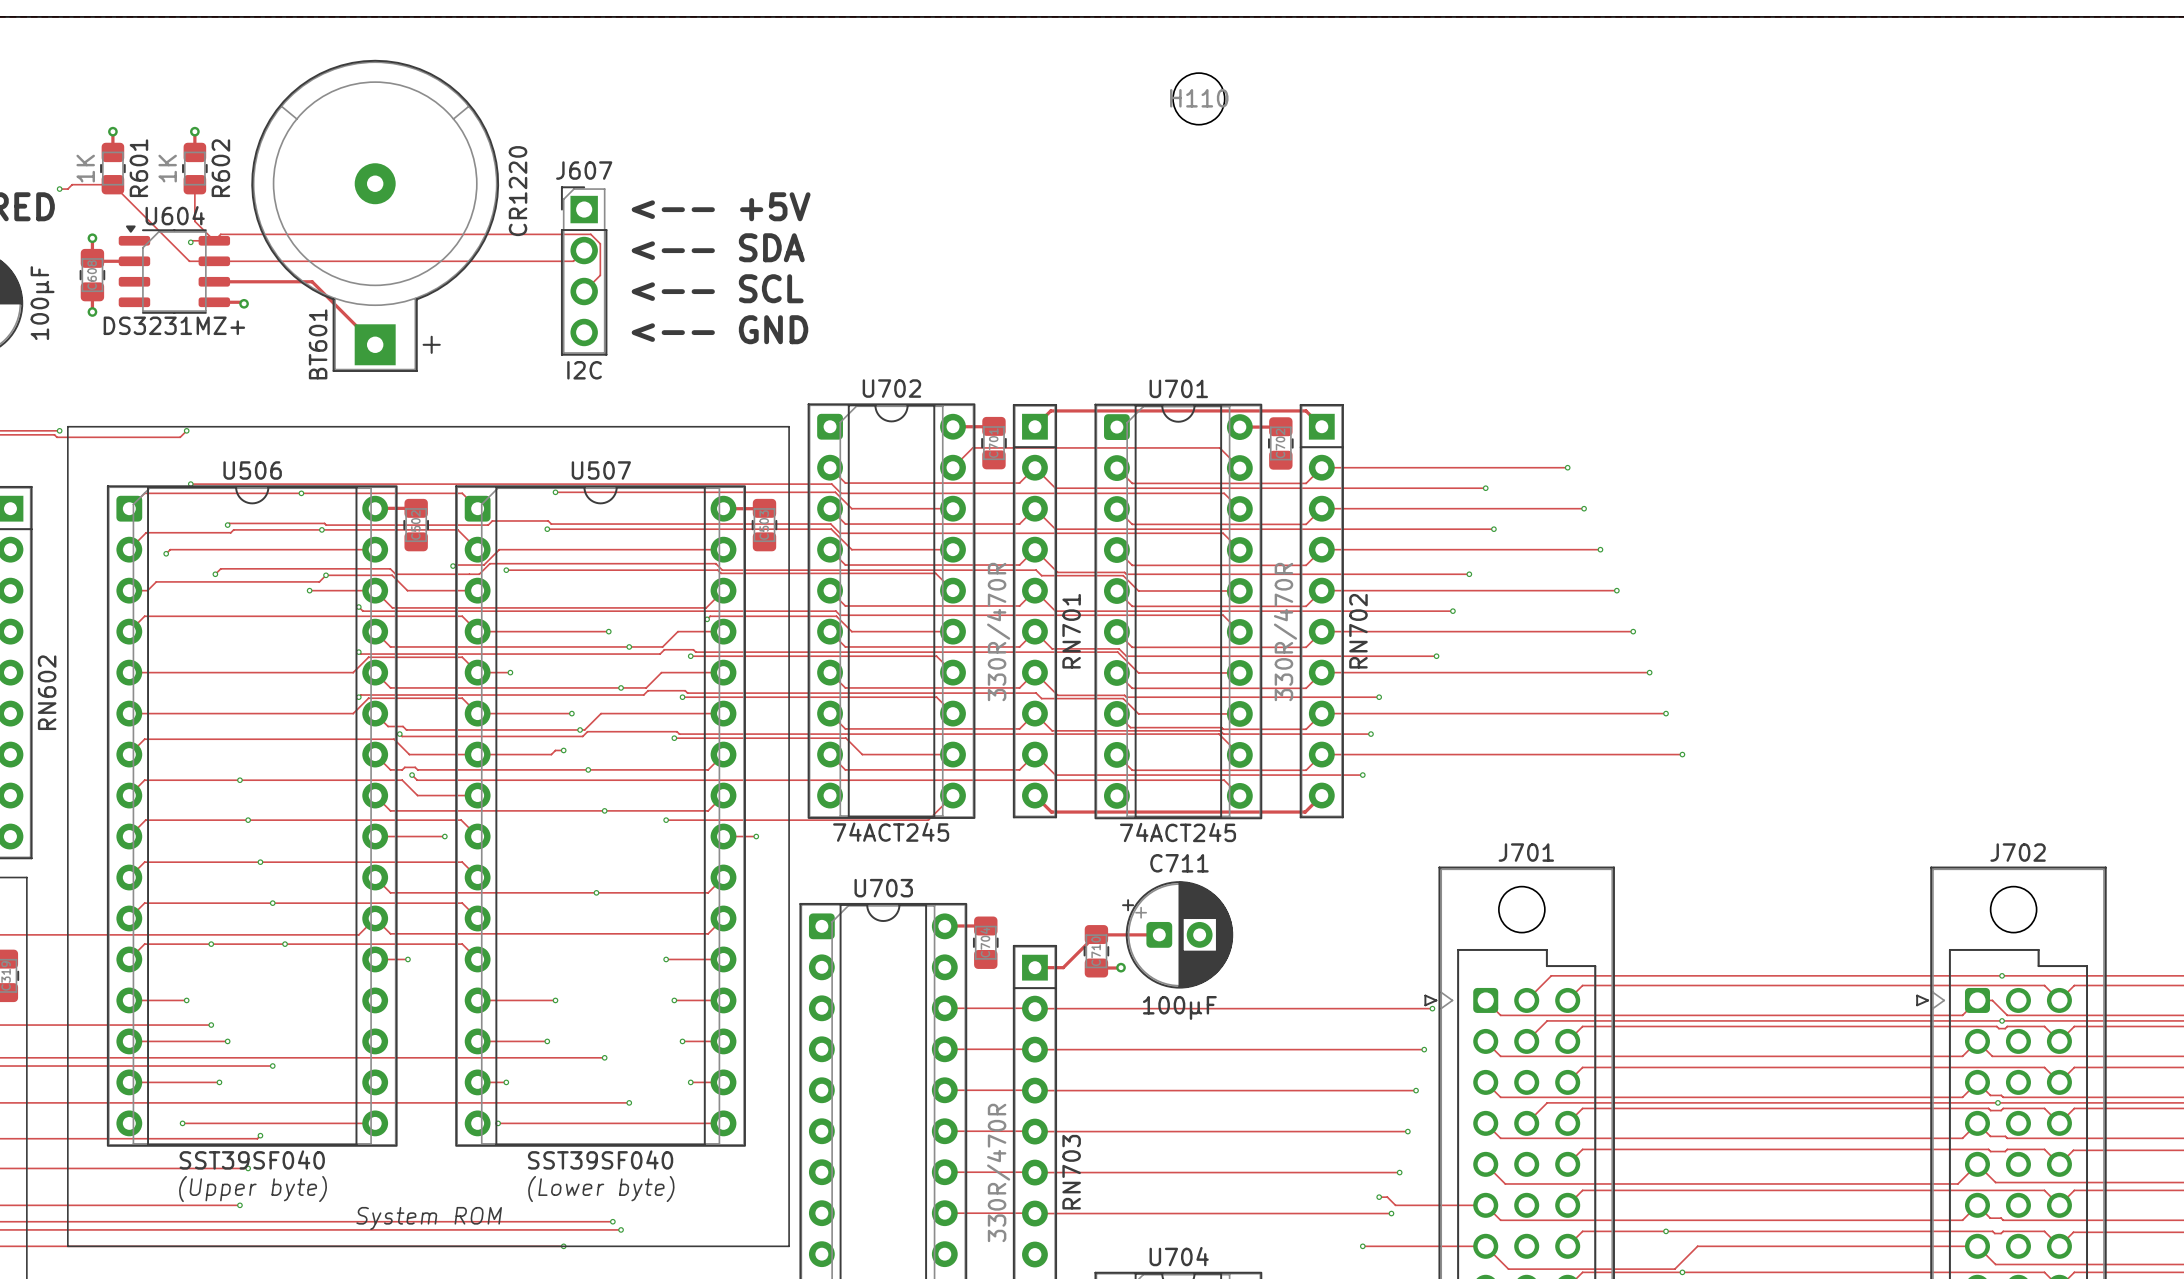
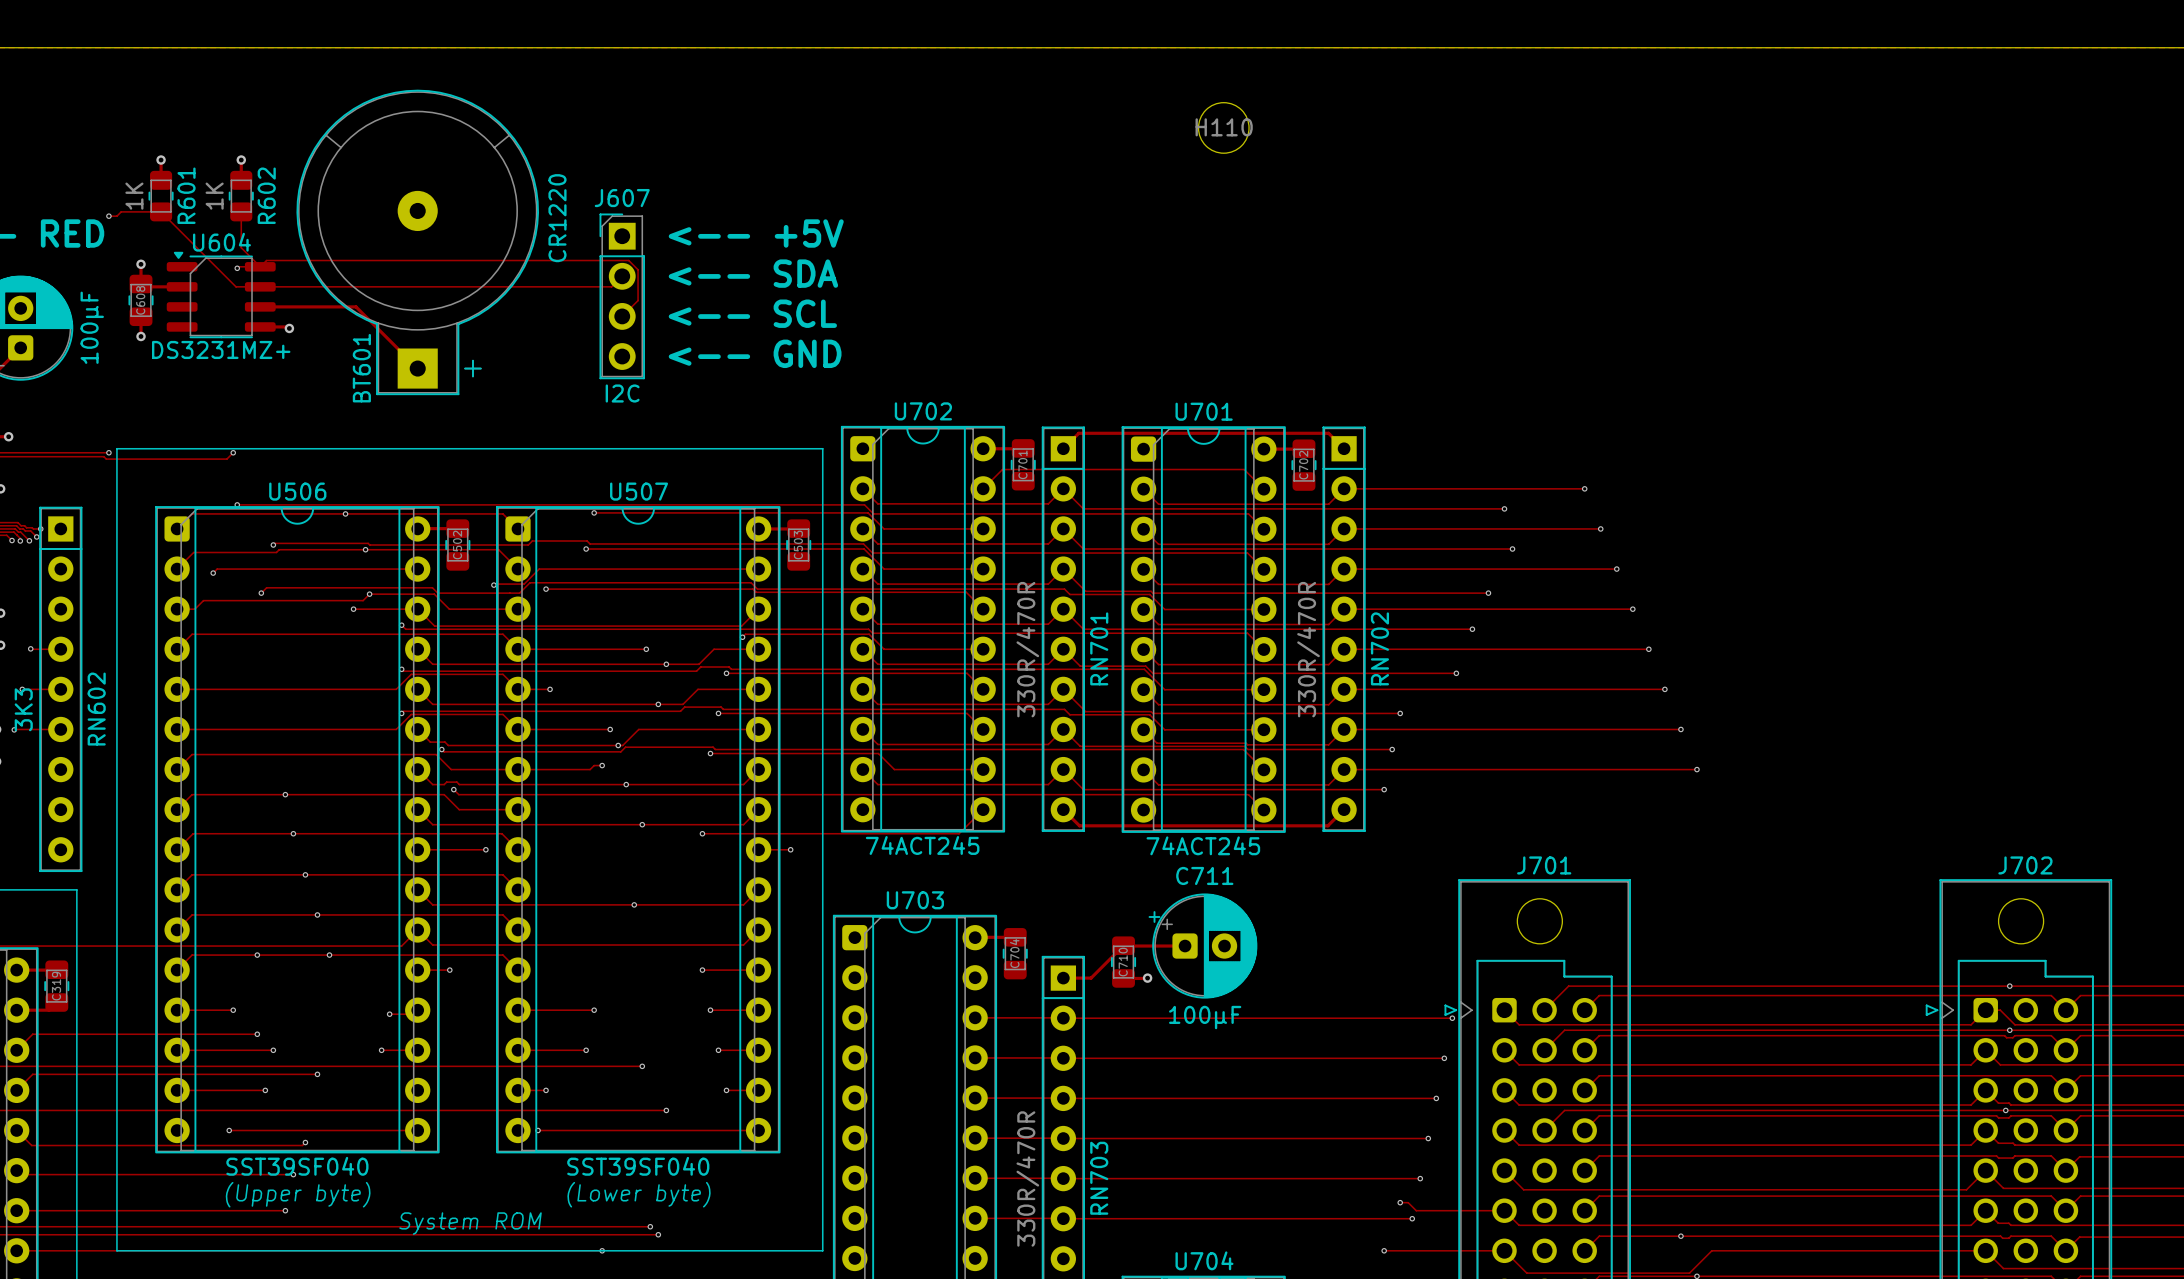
track: none -> (417, 1010) (413, 1014) (389, 1014)
via: none -> (389, 1014)
track: none -> (381, 1050) (417, 1050)
via: none -> (381, 1050)

